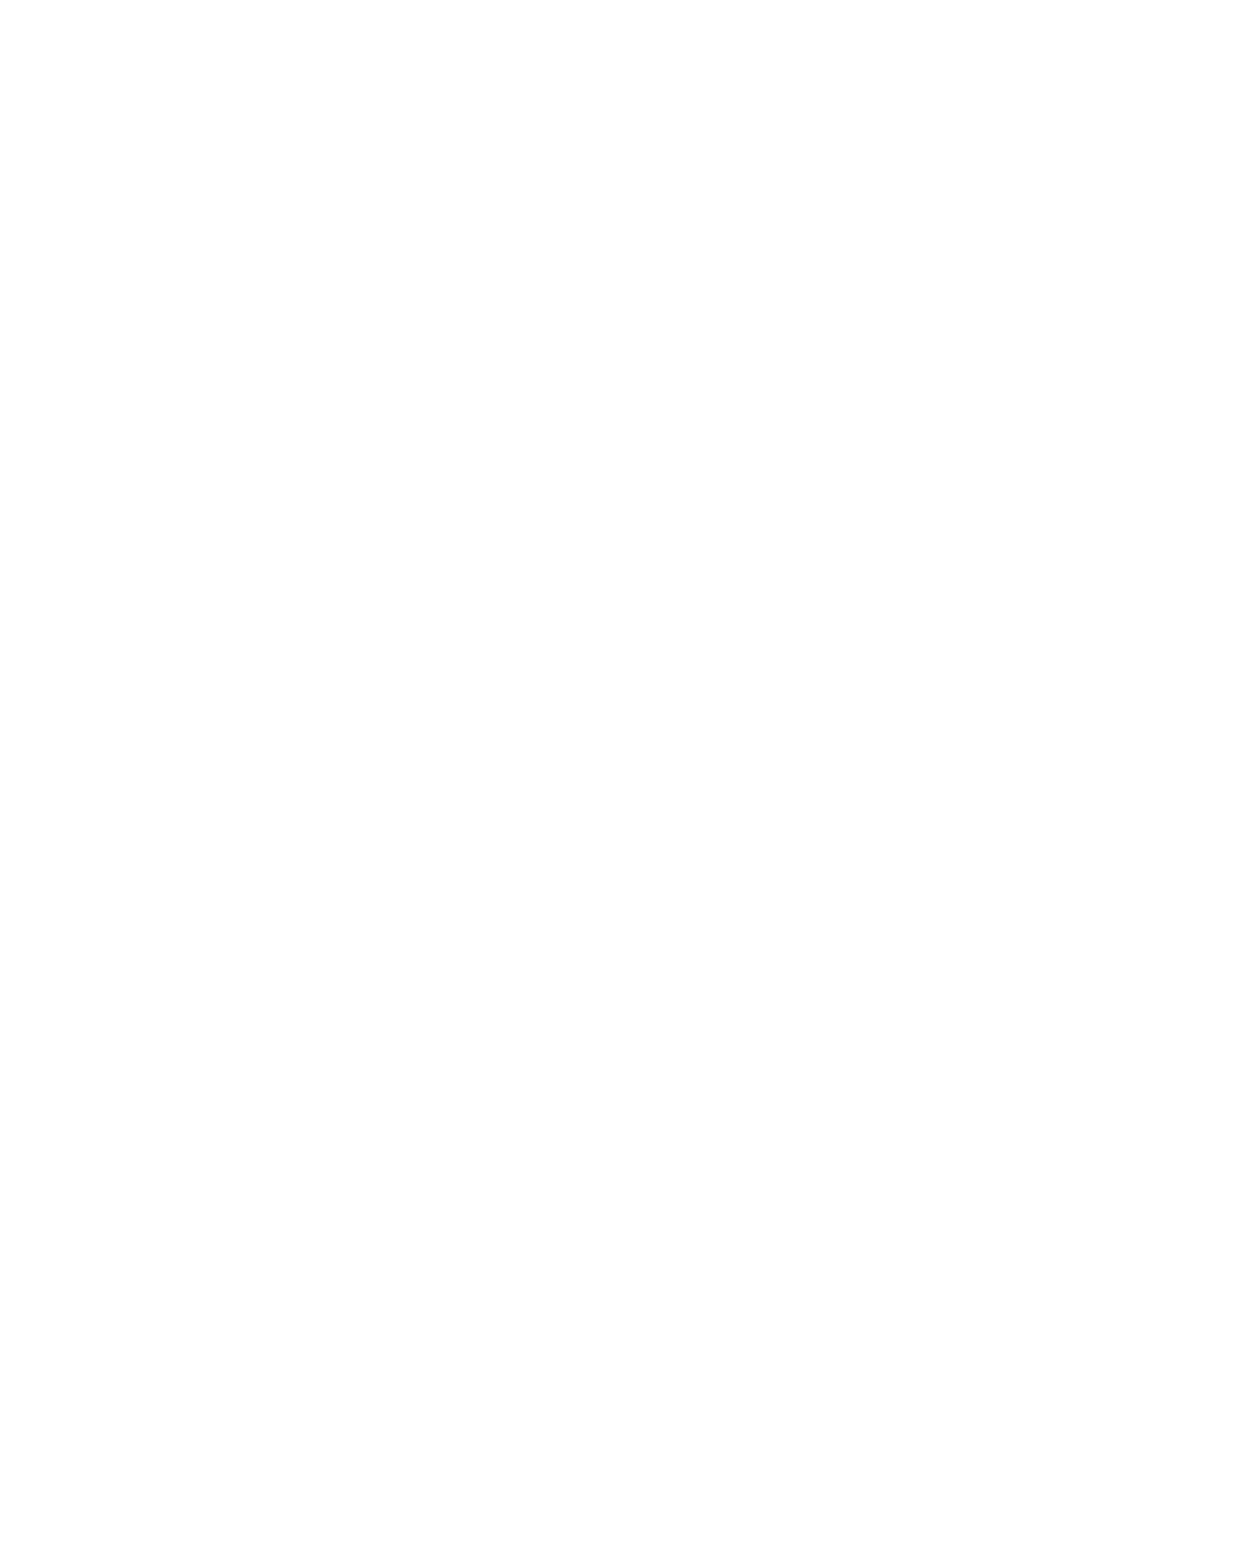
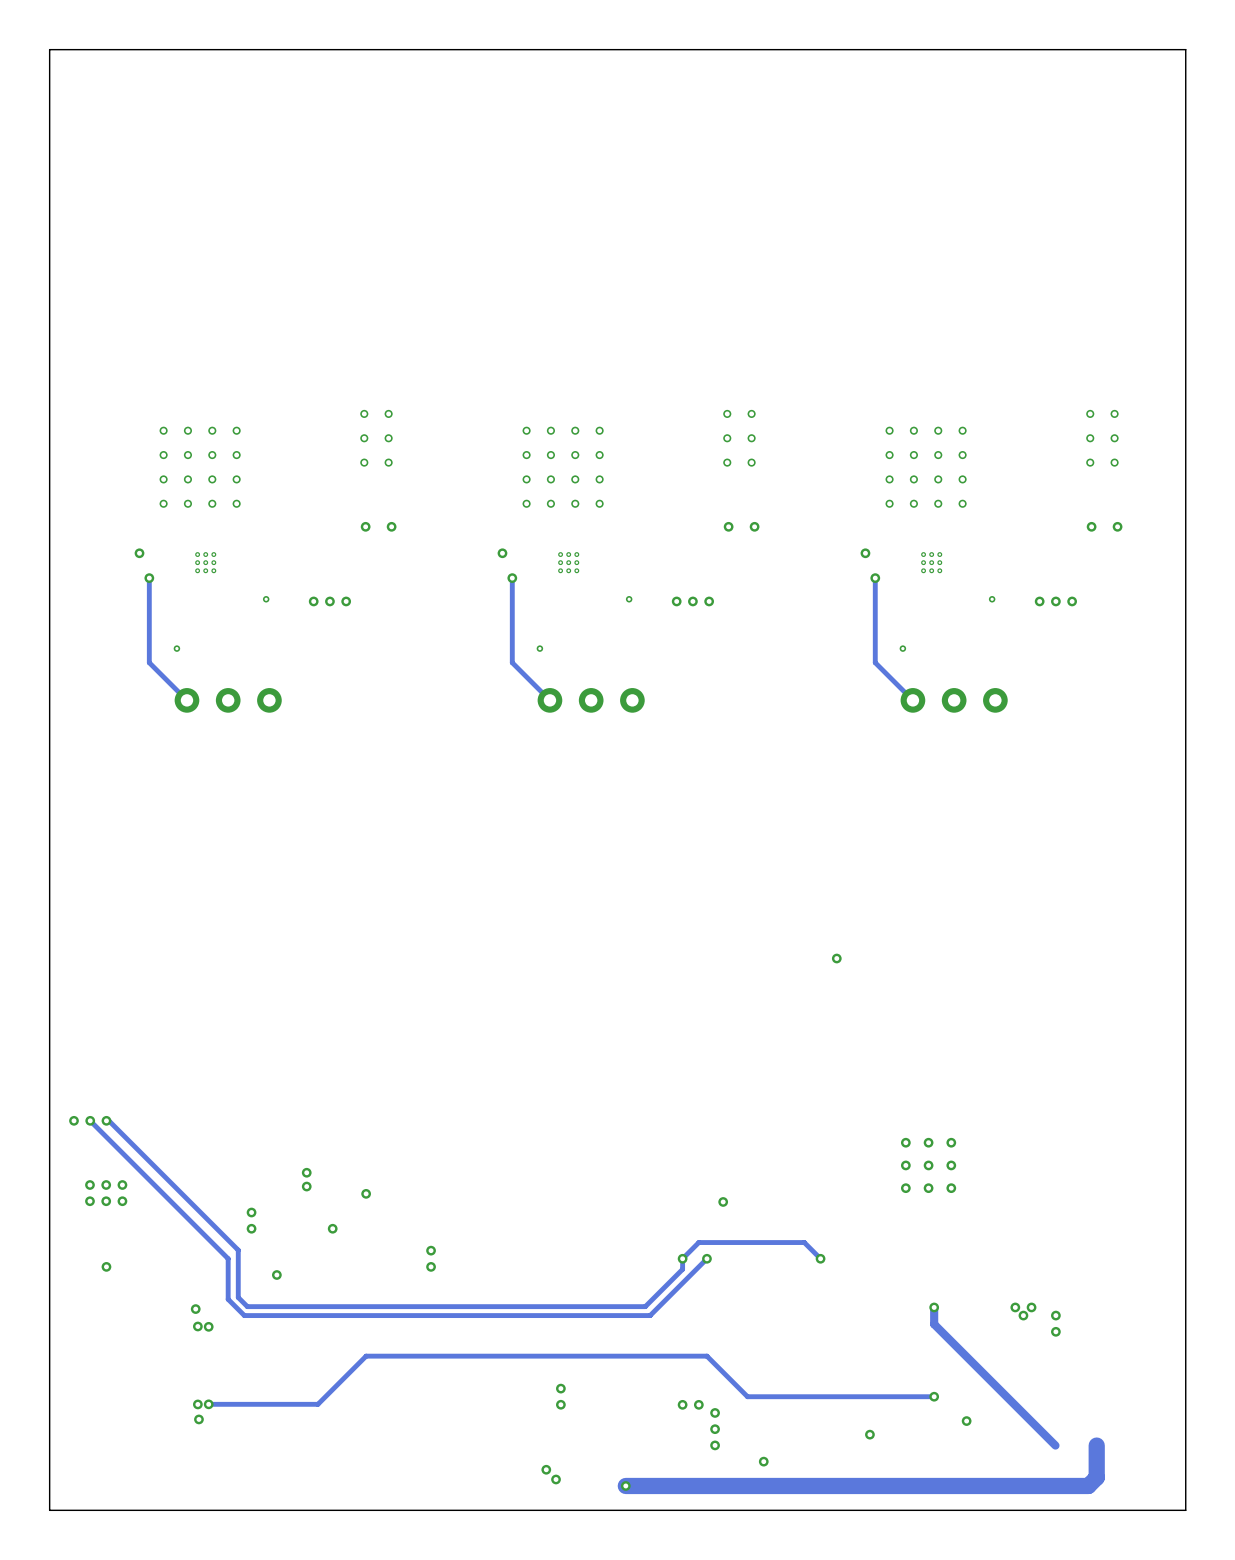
board edge: none -> (1185, 49) (49, 49) (49, 1510) (1185, 1510) (1185, 49)
part: none -> (376, 438)
part: none -> (739, 438)
part: none -> (1102, 438)
part: none -> (200, 467)
part: none -> (563, 467)
part: none -> (926, 467)
via: none -> (365, 526)
via: none -> (391, 526)
via: none -> (728, 526)
via: none -> (754, 526)
via: none -> (1091, 526)
via: none -> (1117, 526)
via: none -> (139, 553)
via: none -> (502, 553)
via: none -> (865, 553)
part: none -> (205, 562)
part: none -> (568, 562)
part: none -> (931, 562)
track: none -> (149, 578) (149, 662) (186, 700)
via: none -> (149, 578)
track: none -> (512, 578) (512, 662) (549, 700)
via: none -> (512, 578)
track: none -> (875, 578) (875, 662) (912, 700)
via: none -> (875, 578)
via: none -> (266, 599)
via: none -> (629, 599)
via: none -> (992, 599)
via: none -> (313, 601)
via: none -> (329, 601)
via: none -> (346, 601)
via: none -> (676, 601)
via: none -> (692, 601)
via: none -> (709, 601)
via: none -> (1039, 601)
via: none -> (1055, 601)
via: none -> (1072, 601)
via: none -> (176, 648)
via: none -> (539, 648)
via: none -> (902, 648)
part: none -> (228, 700)
part: none -> (591, 700)
part: none -> (954, 700)
via: none -> (836, 958)
via: none -> (73, 1120)
track: none -> (90, 1120) (228, 1258) (228, 1299) (244, 1315) (650, 1315) (706, 1258)
via: none -> (90, 1120)
track: none -> (106, 1120) (108, 1120) (238, 1250) (238, 1297) (247, 1306) (645, 1306) (682, 1269) (682, 1258) (698, 1242) (804, 1242) (820, 1258)
via: none -> (106, 1120)
via: none -> (905, 1142)
via: none -> (928, 1142)
via: none -> (951, 1142)
via: none -> (905, 1165)
via: none -> (928, 1165)
via: none -> (951, 1165)
via: none -> (306, 1172)
via: none -> (306, 1186)
via: none -> (905, 1188)
via: none -> (928, 1188)
via: none -> (951, 1188)
part: none -> (106, 1193)
via: none -> (366, 1193)
via: none -> (723, 1201)
via: none -> (251, 1212)
via: none -> (251, 1228)
via: none -> (332, 1228)
via: none -> (431, 1250)
via: none -> (682, 1258)
via: none -> (706, 1258)
via: none -> (820, 1258)
via: none -> (106, 1266)
via: none -> (431, 1266)
via: none -> (276, 1274)
track: none -> (934, 1307) (934, 1324) (1055, 1445)
via: none -> (934, 1307)
via: none -> (1015, 1307)
via: none -> (1031, 1307)
via: none -> (195, 1309)
via: none -> (1023, 1315)
via: none -> (1055, 1315)
via: none -> (197, 1326)
via: none -> (208, 1326)
via: none -> (1055, 1331)
via: none -> (560, 1388)
track: none -> (934, 1396) (747, 1396) (706, 1356) (366, 1356) (317, 1404) (208, 1404)
via: none -> (934, 1396)
via: none -> (197, 1404)
via: none -> (208, 1404)
via: none -> (560, 1404)
via: none -> (682, 1404)
via: none -> (698, 1404)
via: none -> (715, 1412)
via: none -> (198, 1419)
via: none -> (966, 1421)
via: none -> (715, 1429)
via: none -> (869, 1434)
via: none -> (715, 1445)
track: none -> (1096, 1445) (1096, 1477) (1088, 1485) (625, 1485)
via: none -> (763, 1461)
via: none -> (546, 1469)
via: none -> (556, 1479)
via: none -> (625, 1485)

